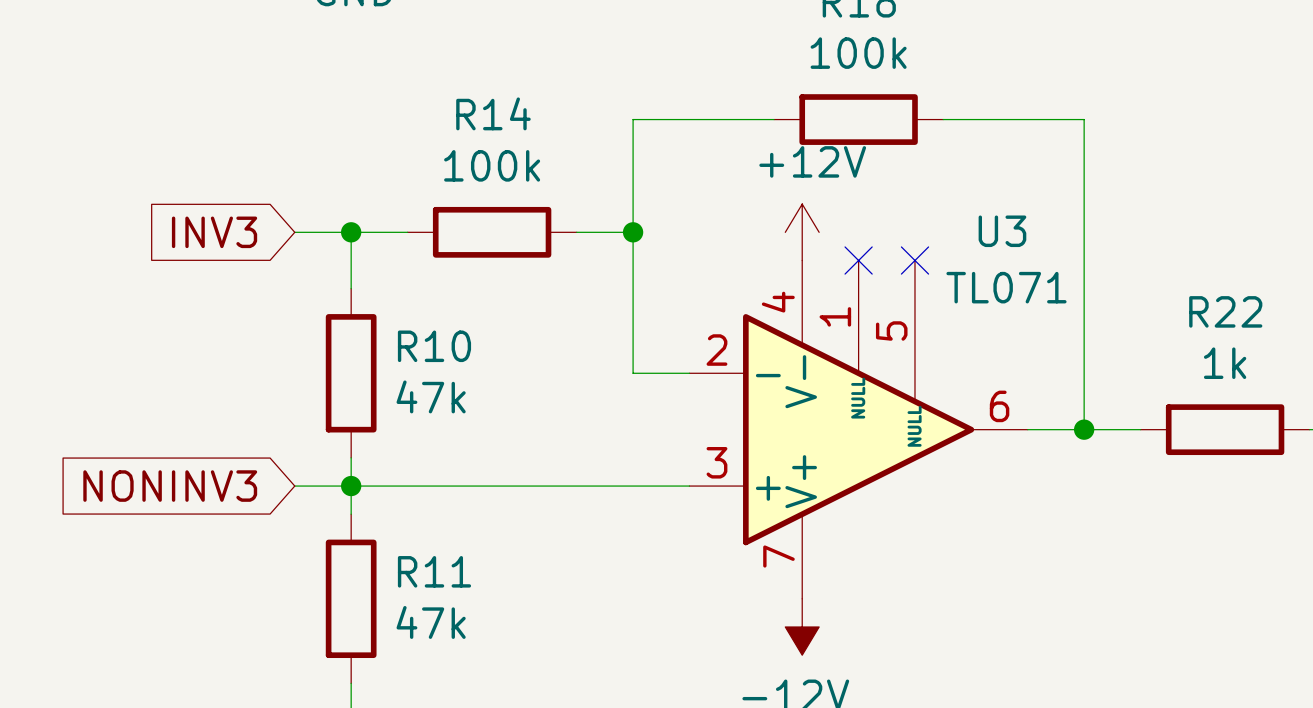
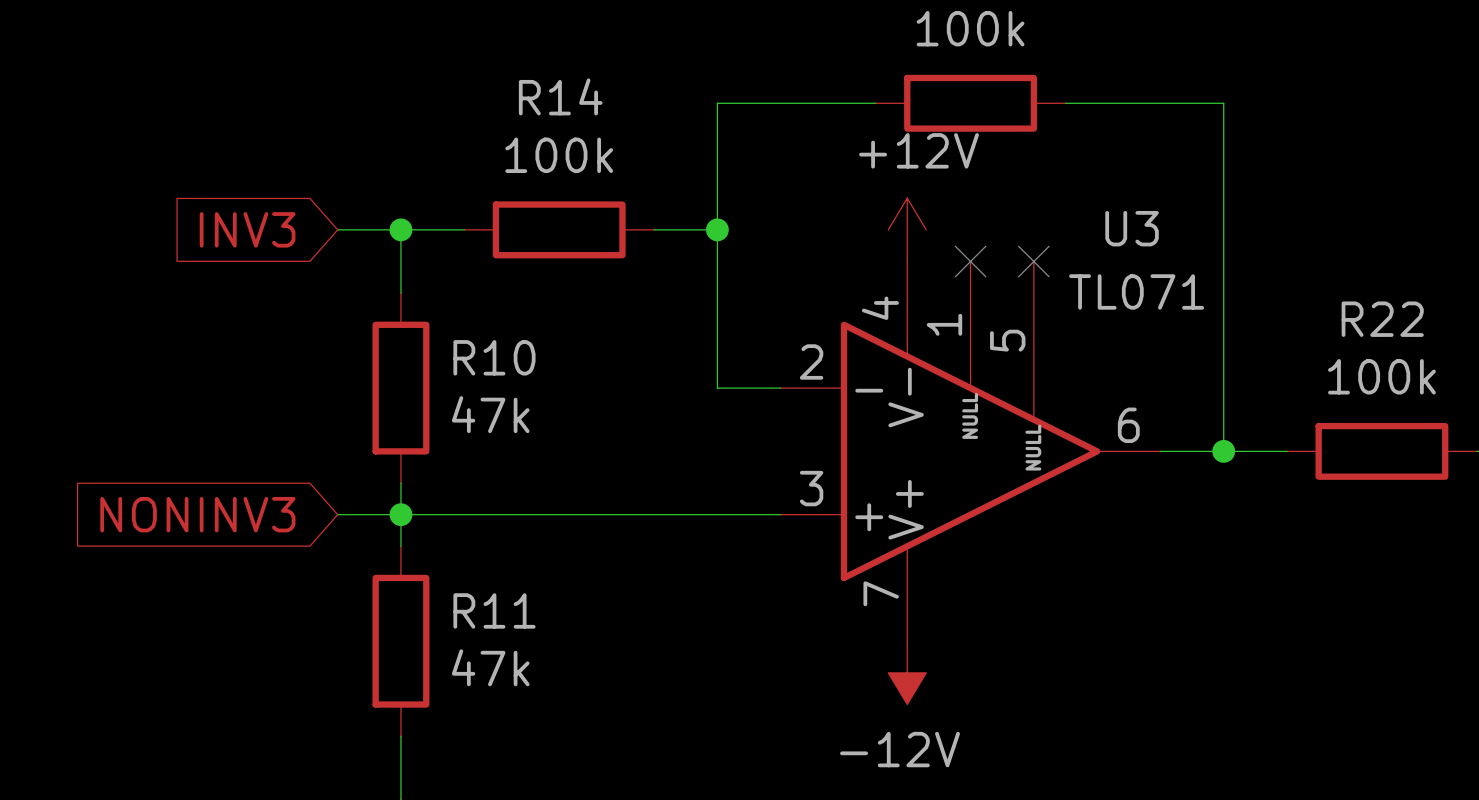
R22 value: 1k (1225, 363) -> 100k (1381, 376)

